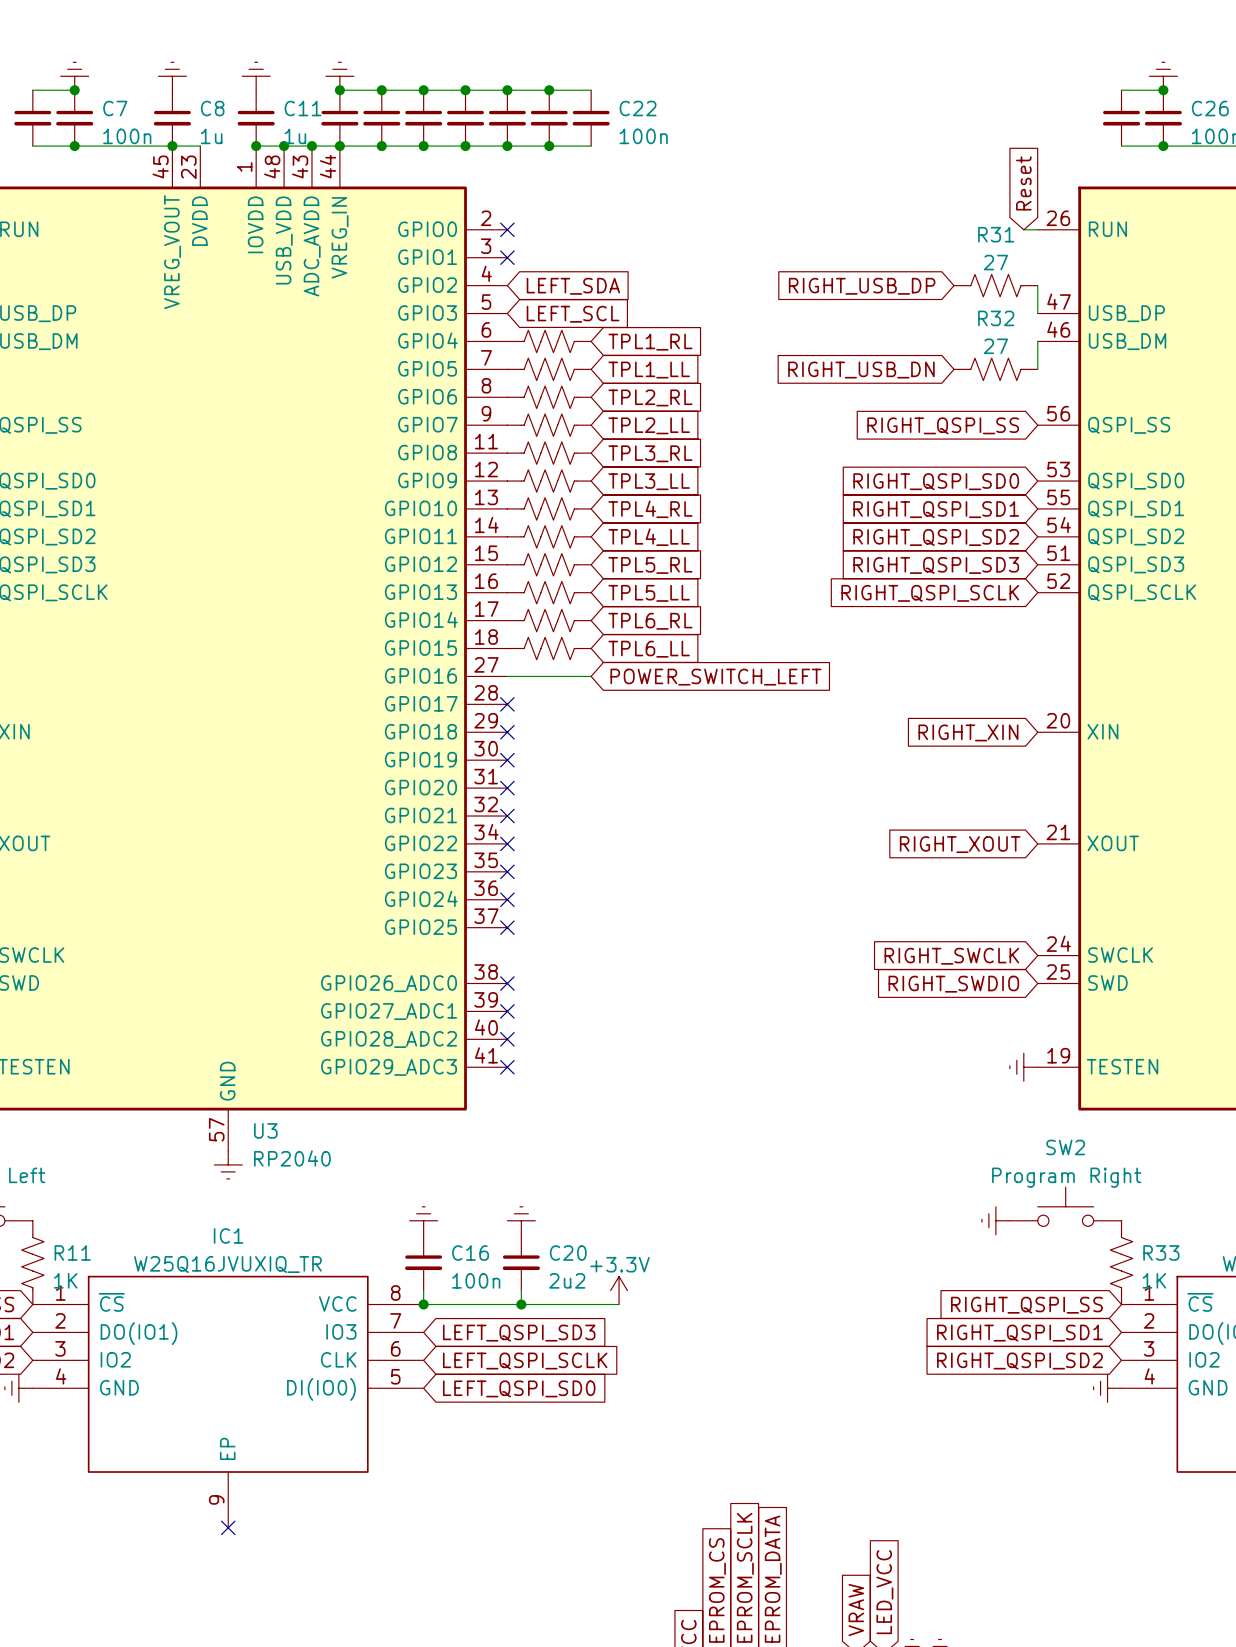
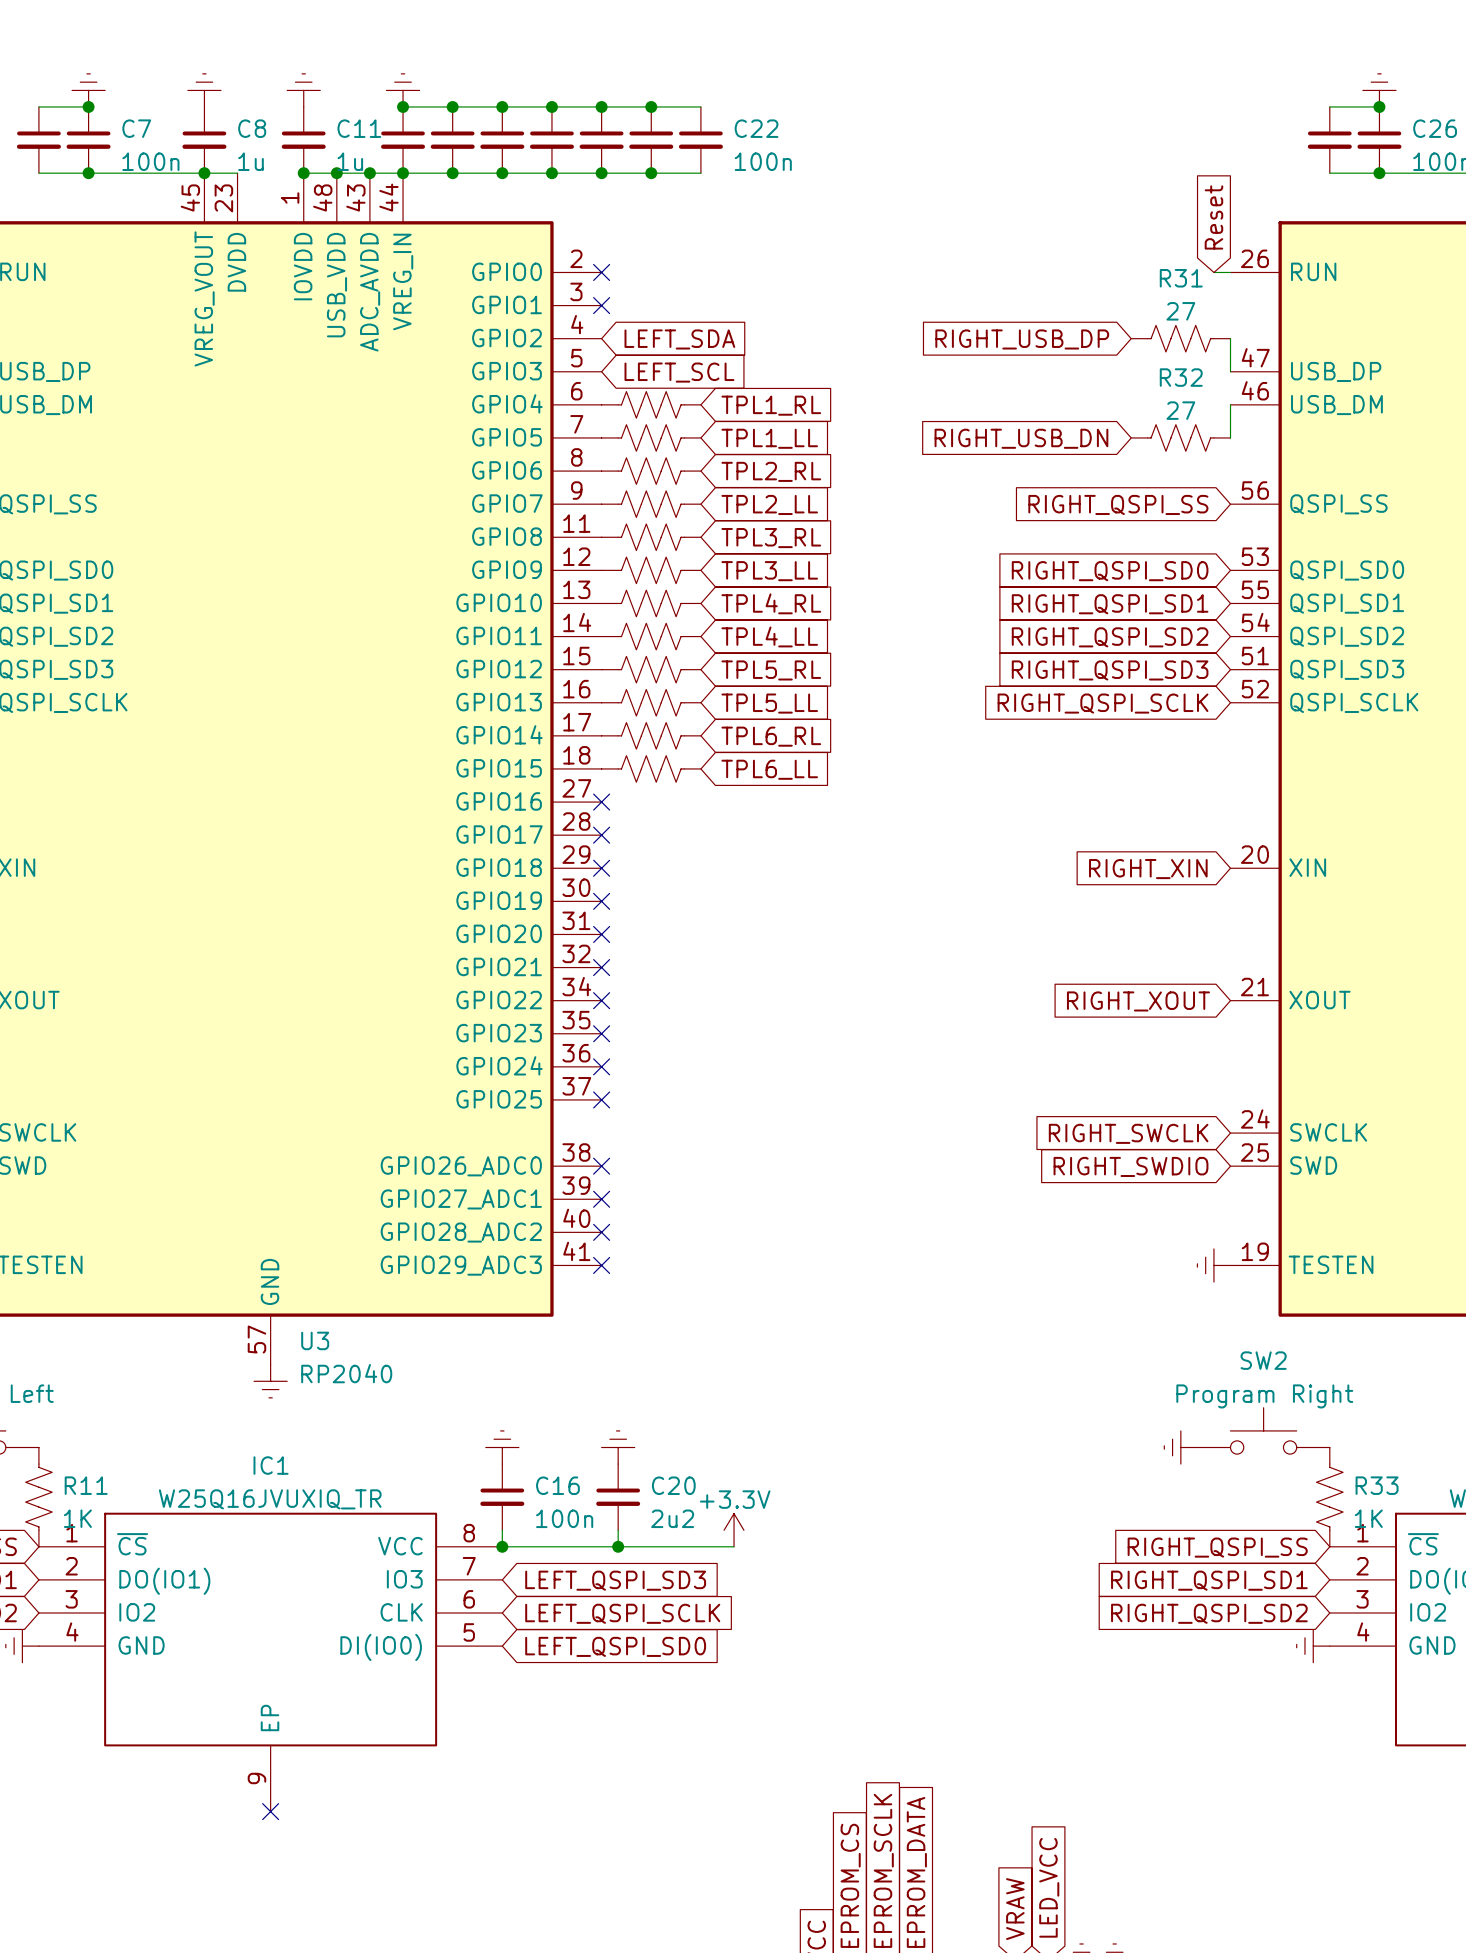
wire: (507, 676) (591, 676) -> none
no-connect mark: none -> (601, 802)
global label: POWER_SWITCH_LEFT (715, 677) -> none

